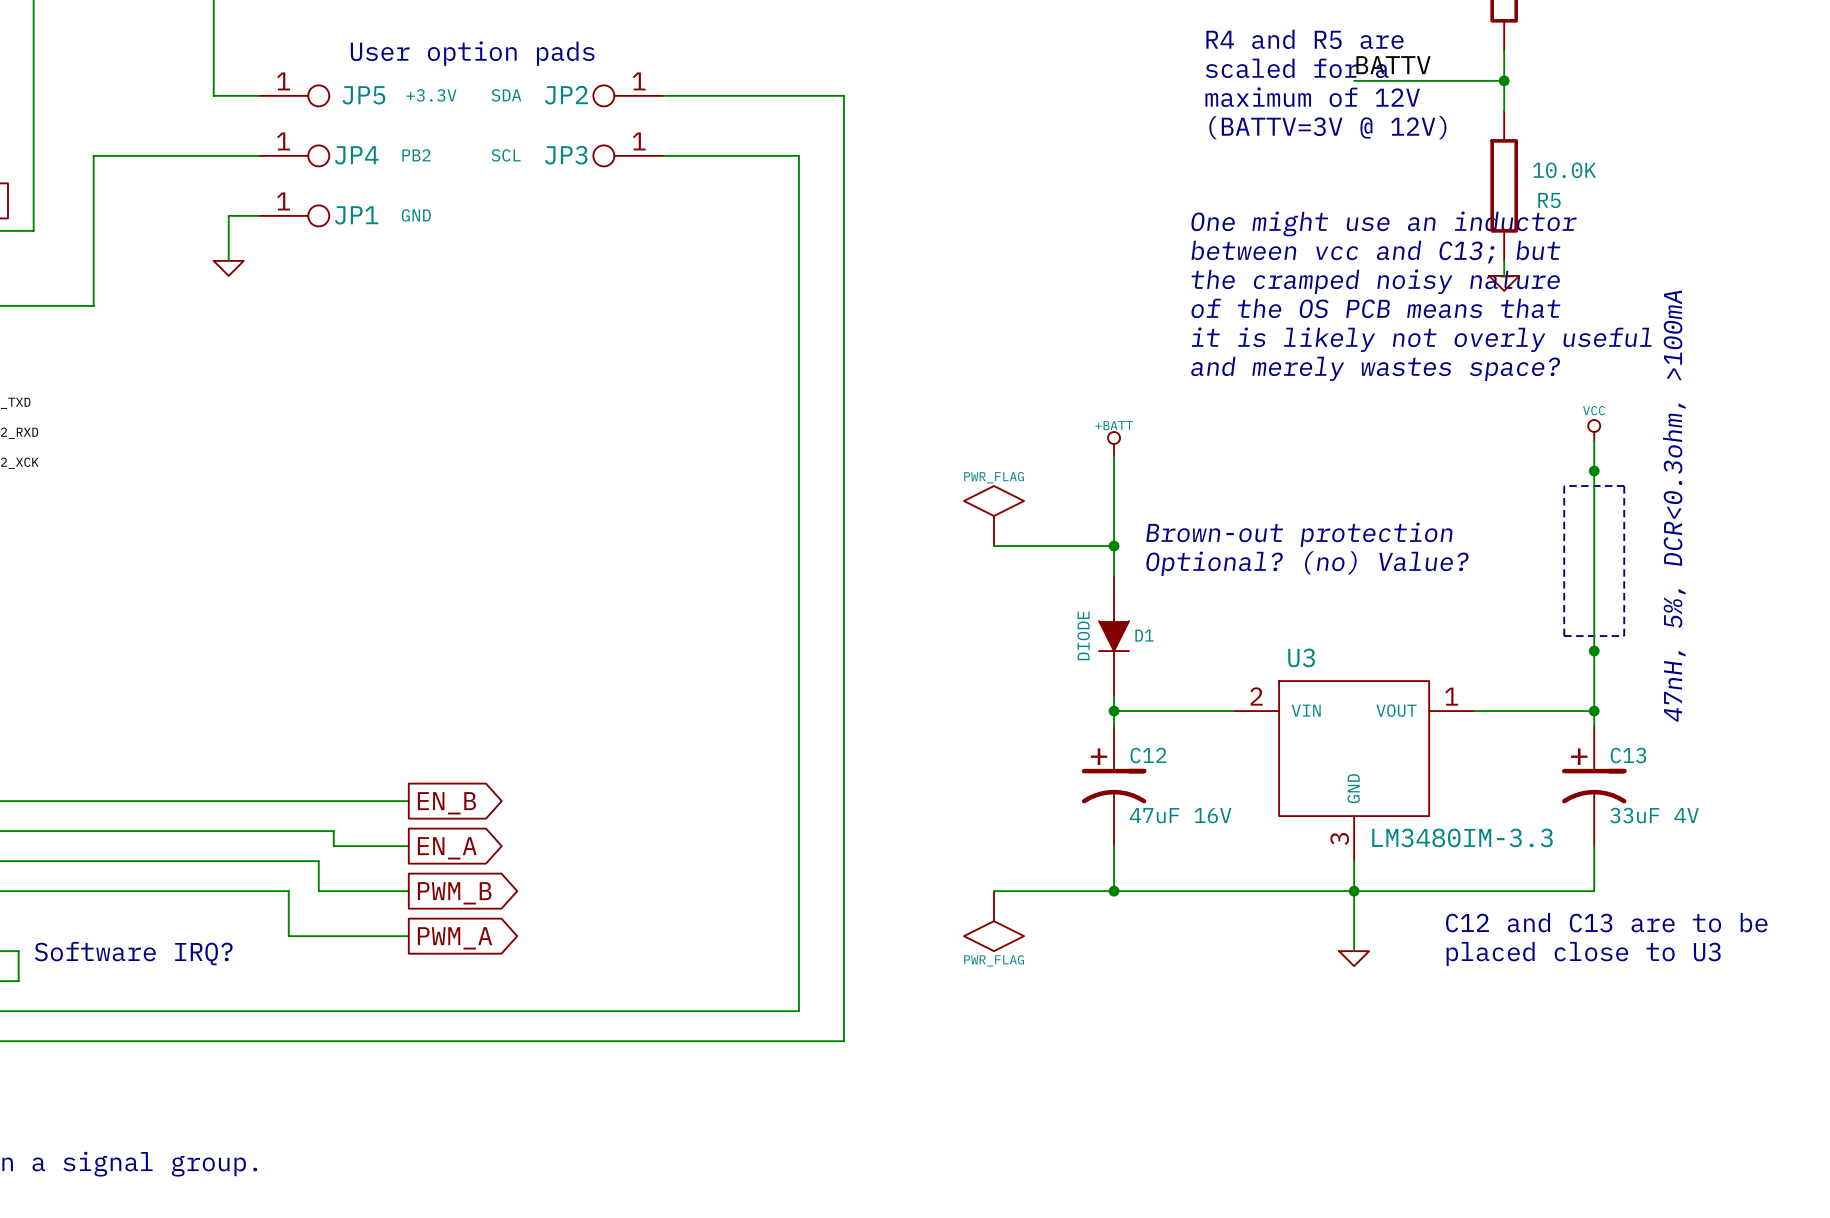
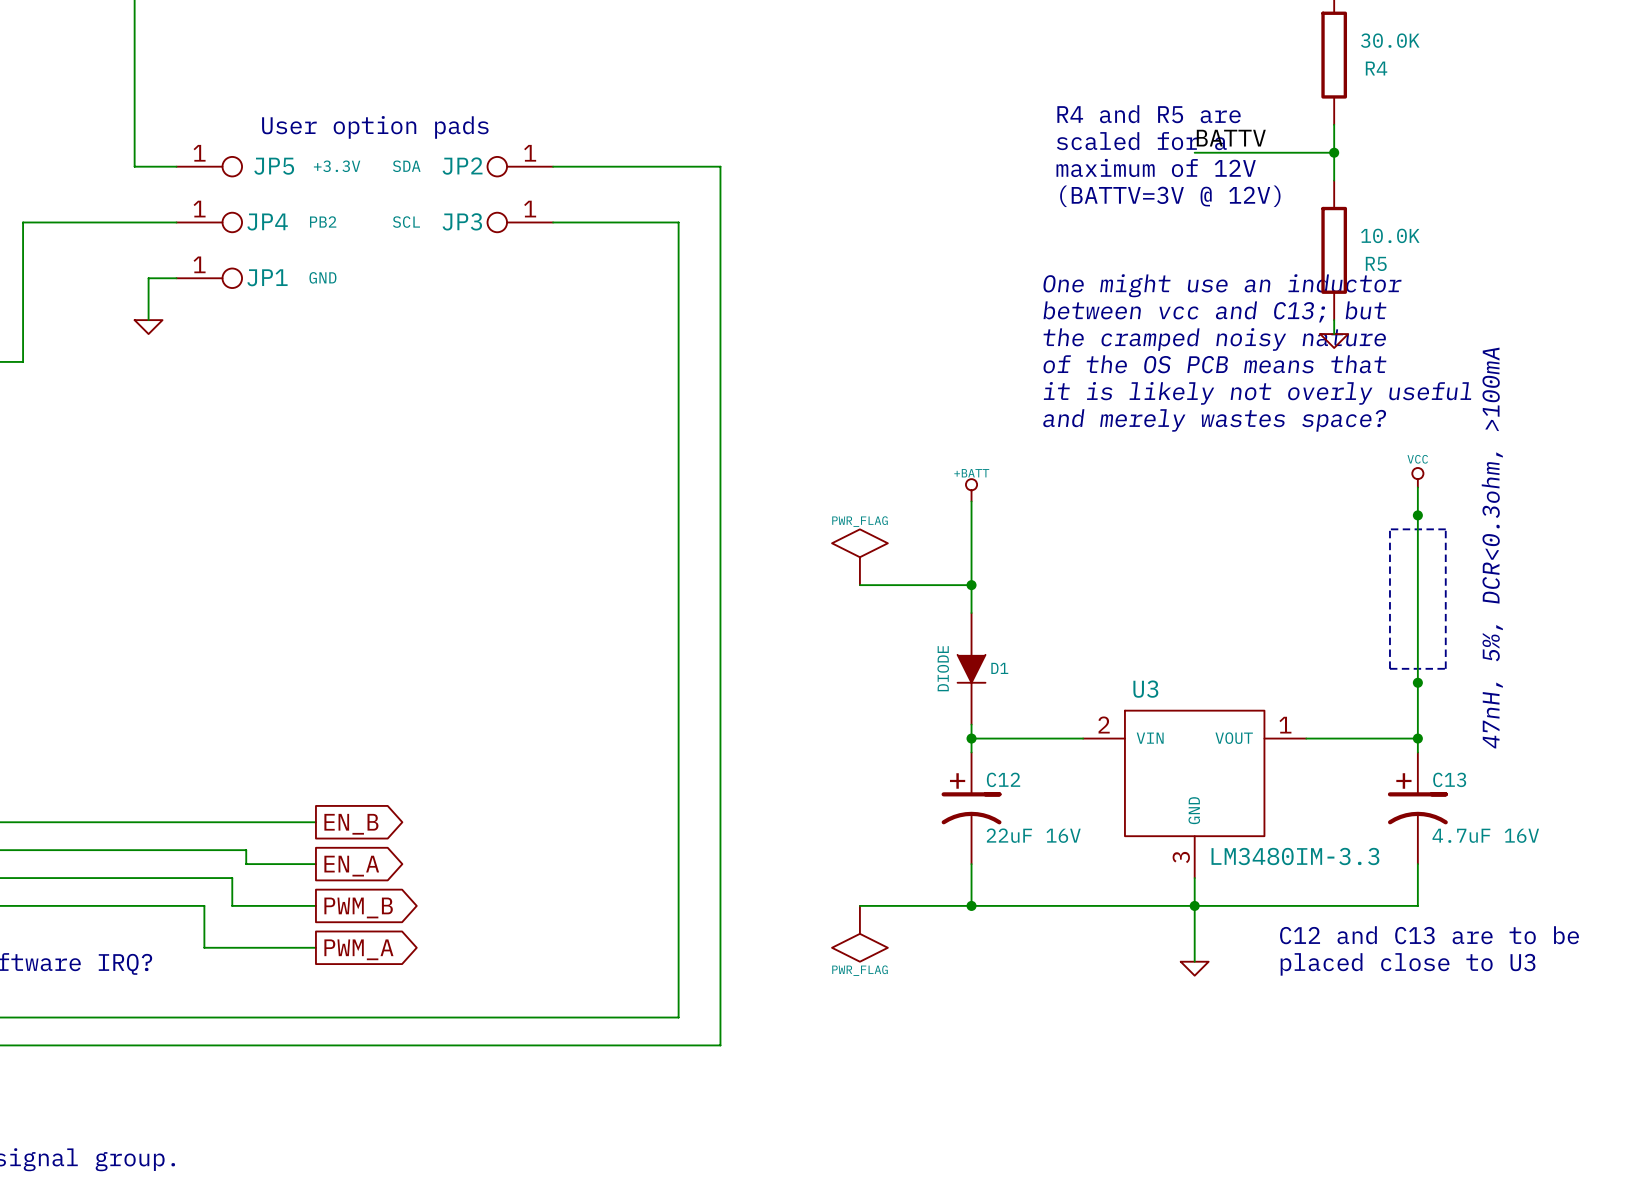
text: Brown-out protection (1299, 534) -> none
text: Optional? (no) Value? (1307, 563) -> none
C12 value: 47uF 16V (1180, 815) -> 22uF 16V (1033, 835)
C13 value: 33uF 4V (1654, 815) -> 4.7uF 16V (1485, 835)

